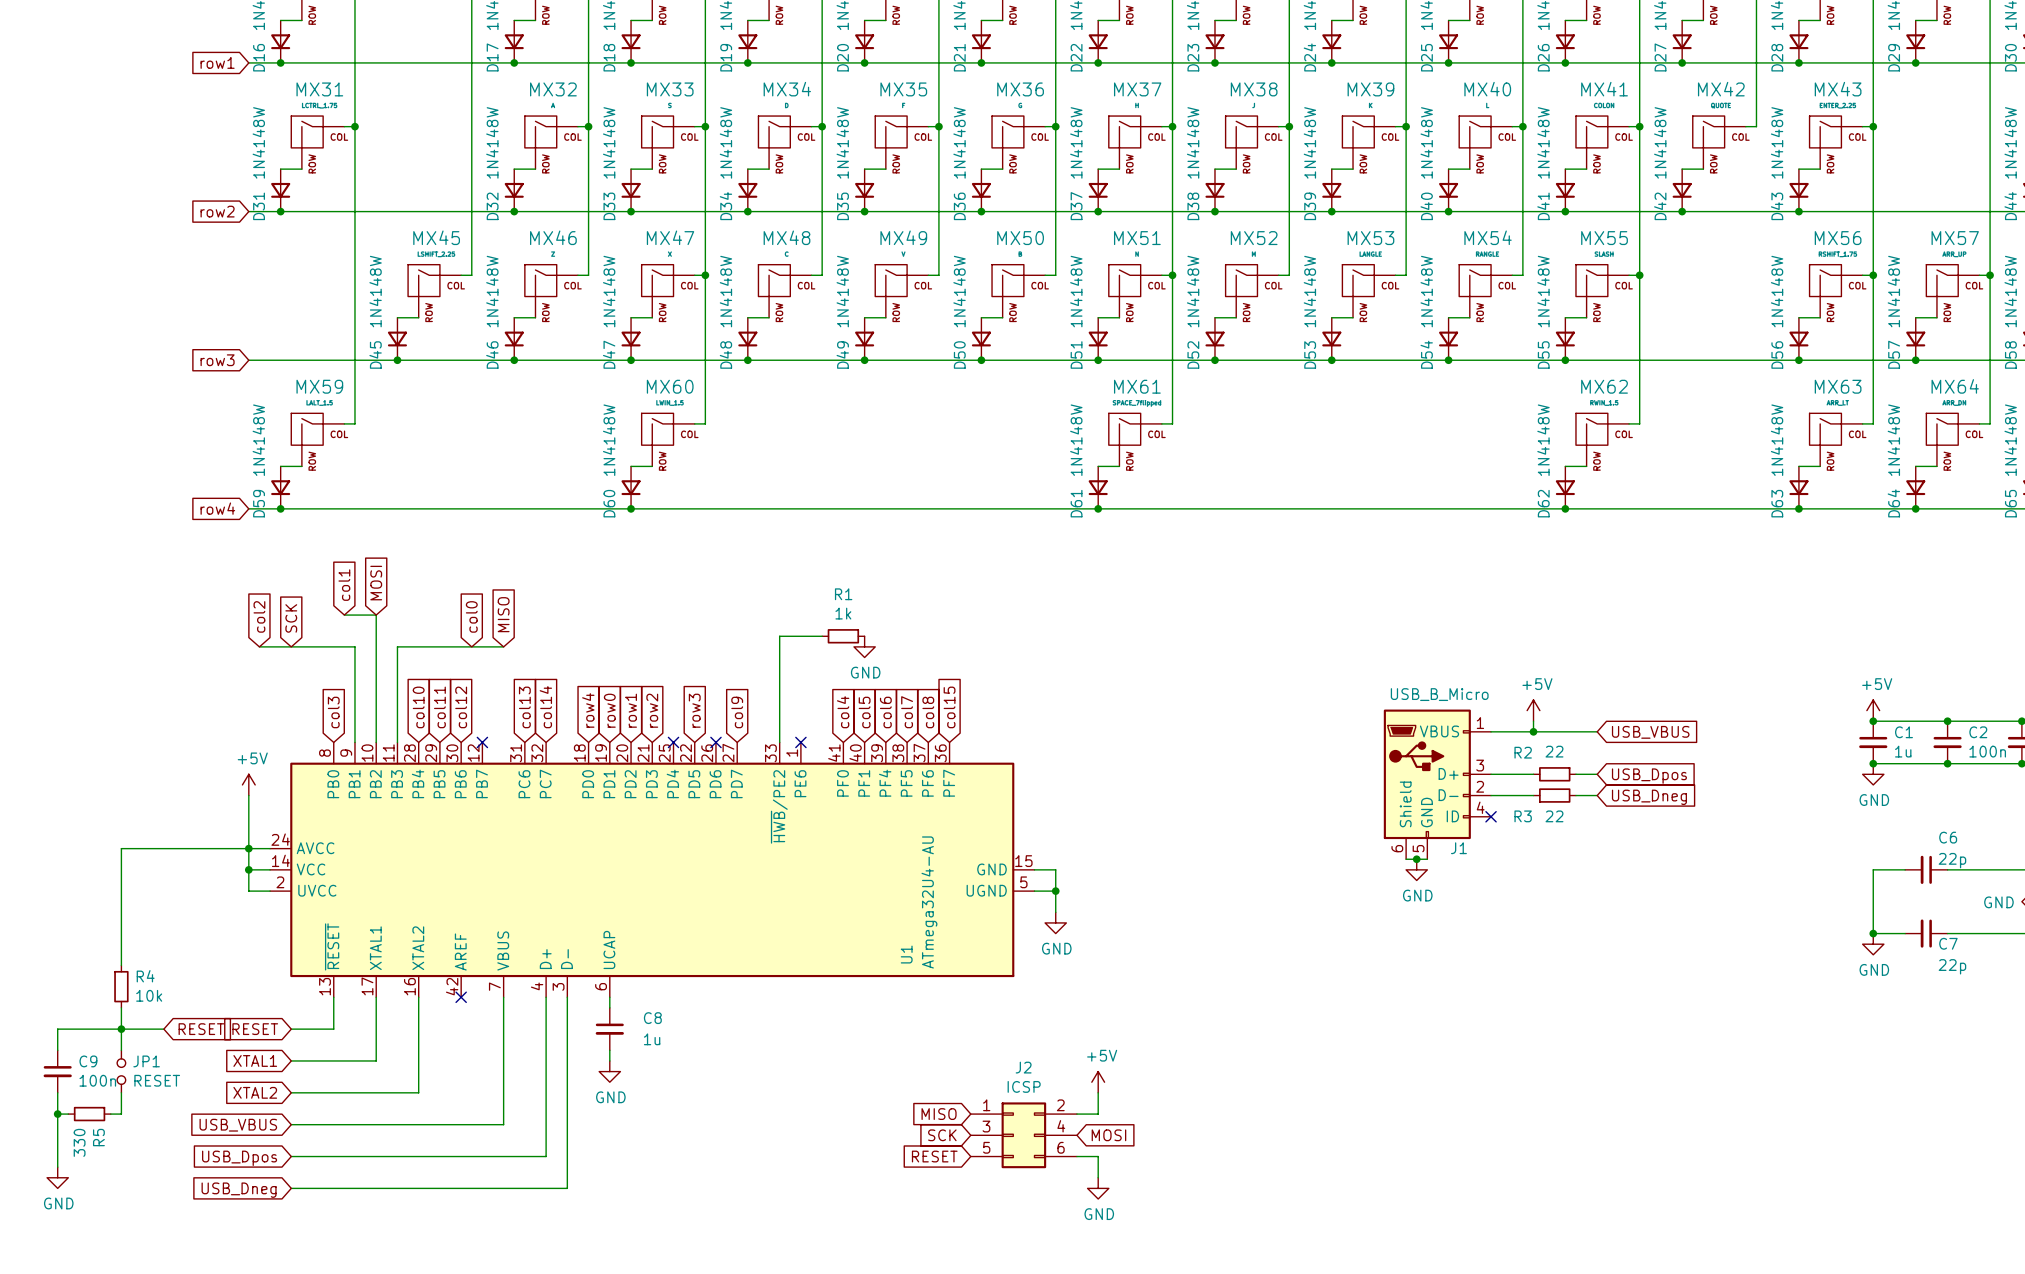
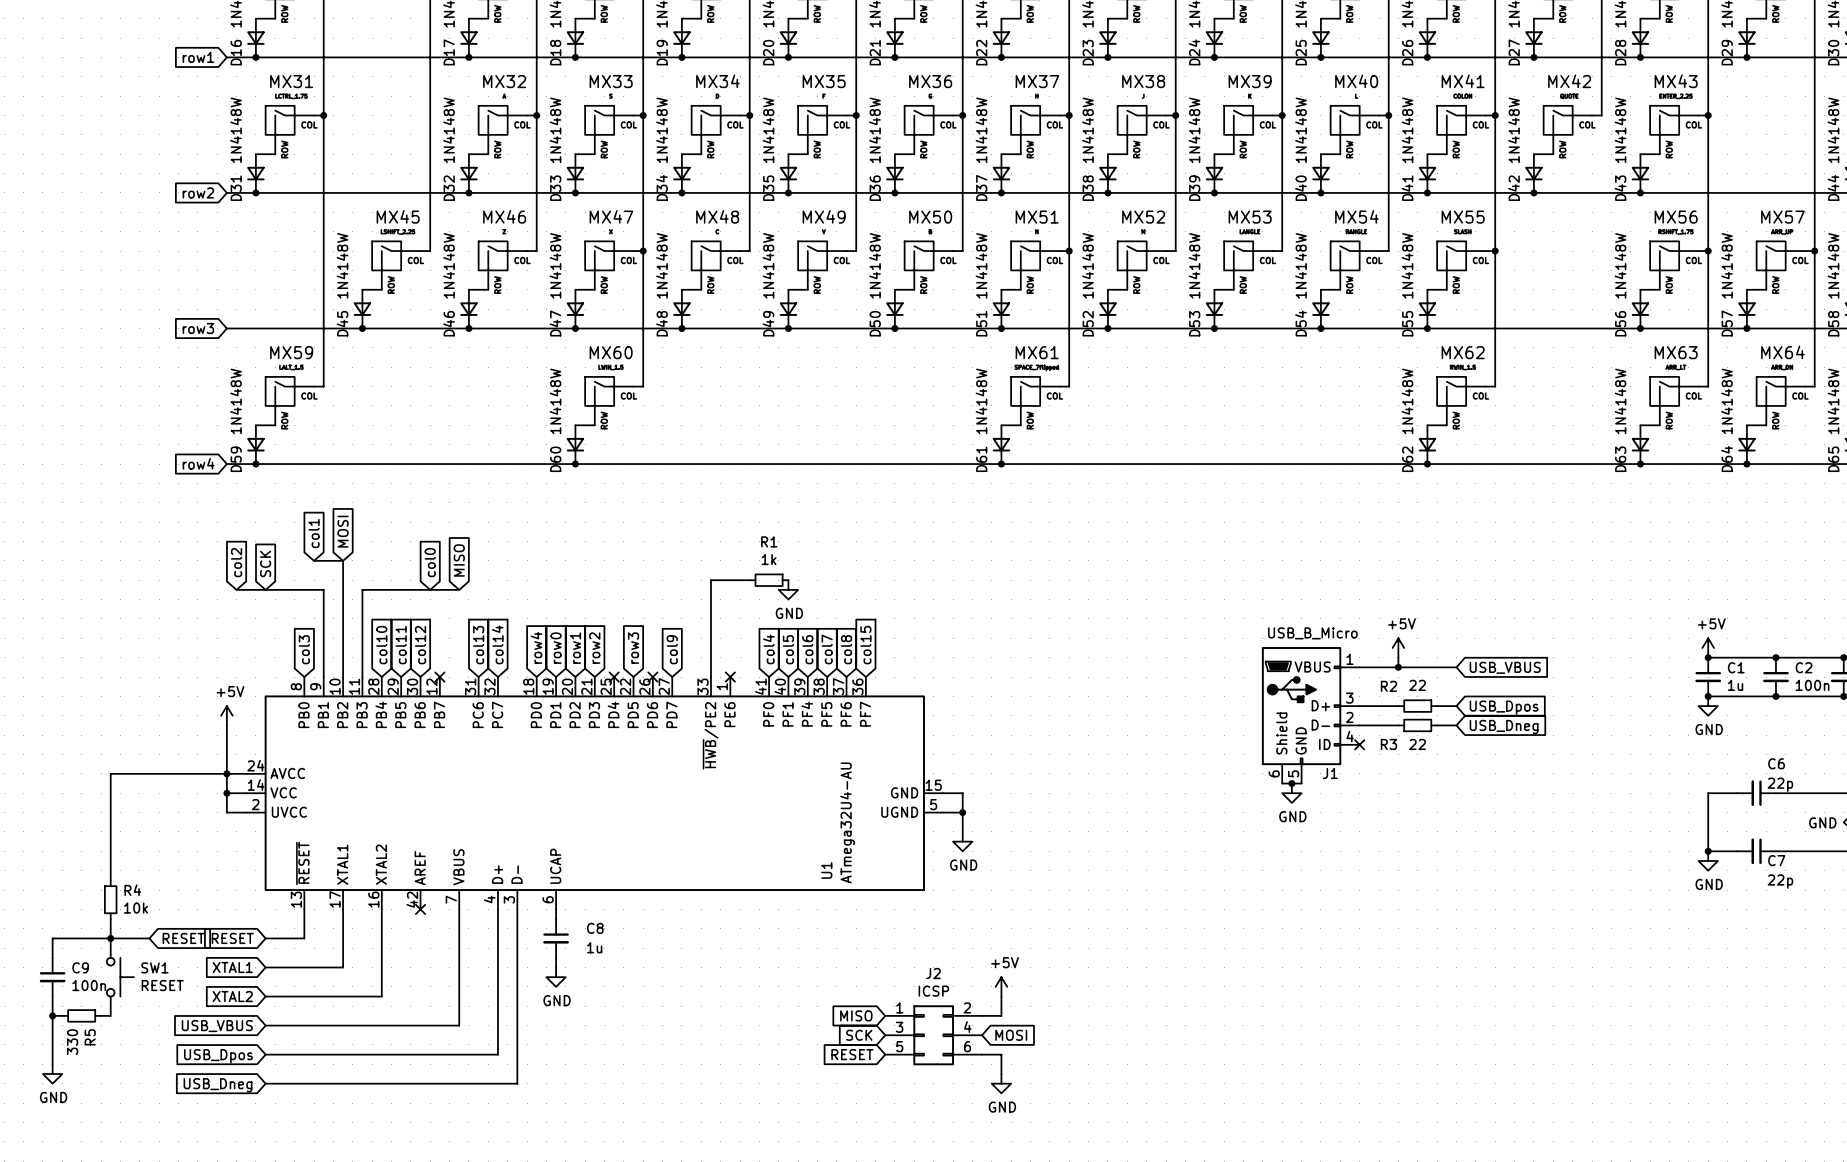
JP1: RESET (121, 1071) -> none
SW1: none -> RESET (120, 977)

